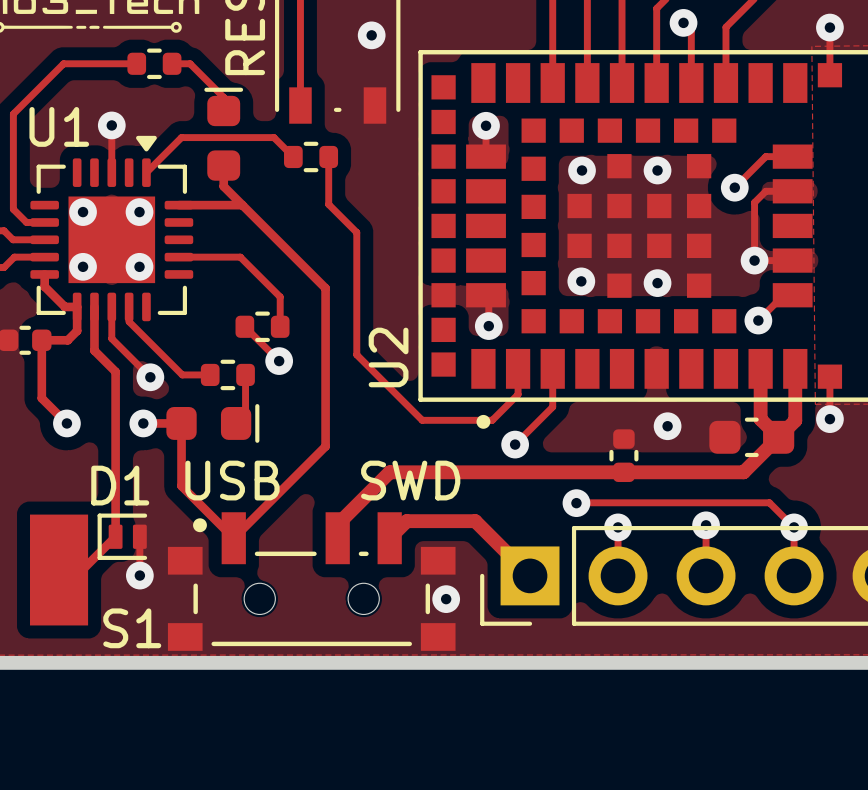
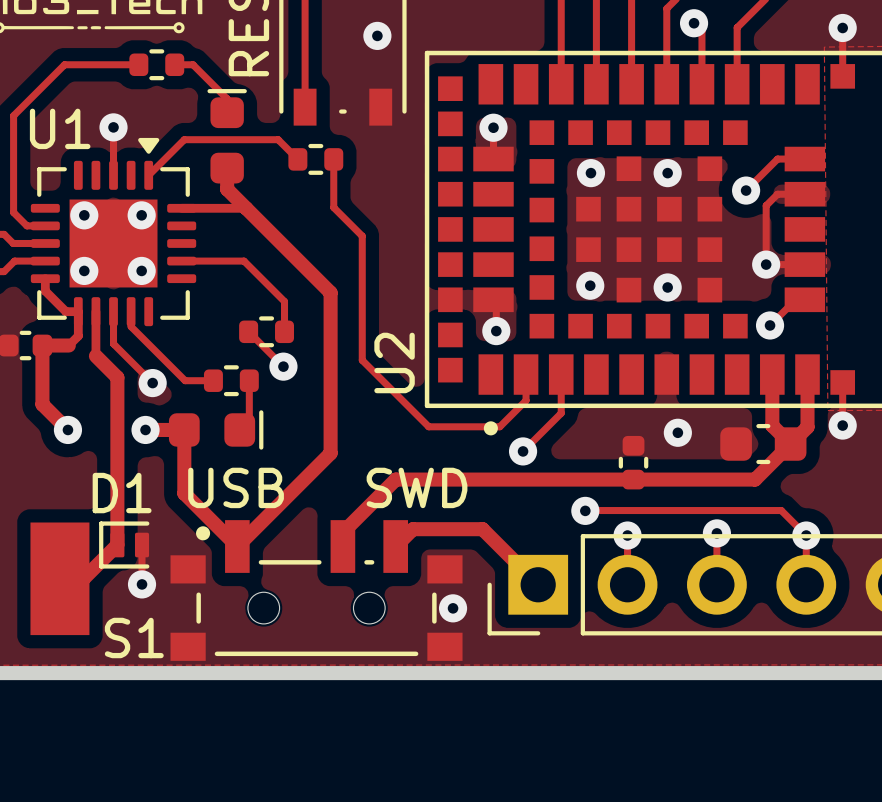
track width: thin (223, 165) (223, 186) (325, 288) (325, 446) (233, 538) (181, 485) (181, 423) (143, 423) -> thick (227, 168) (227, 189) (330, 292) (330, 453) (237, 546) (184, 493) (184, 429) (145, 429)
track width: thin (67, 340) (41, 340) (41, 398) (66, 423) -> thick (68, 345) (42, 345) (42, 404) (67, 429)
track width: thin (94, 350) (115, 371) (115, 536) (82, 570) (59, 570) -> thick (95, 356) (117, 377) (117, 545) (83, 578) (59, 578)

